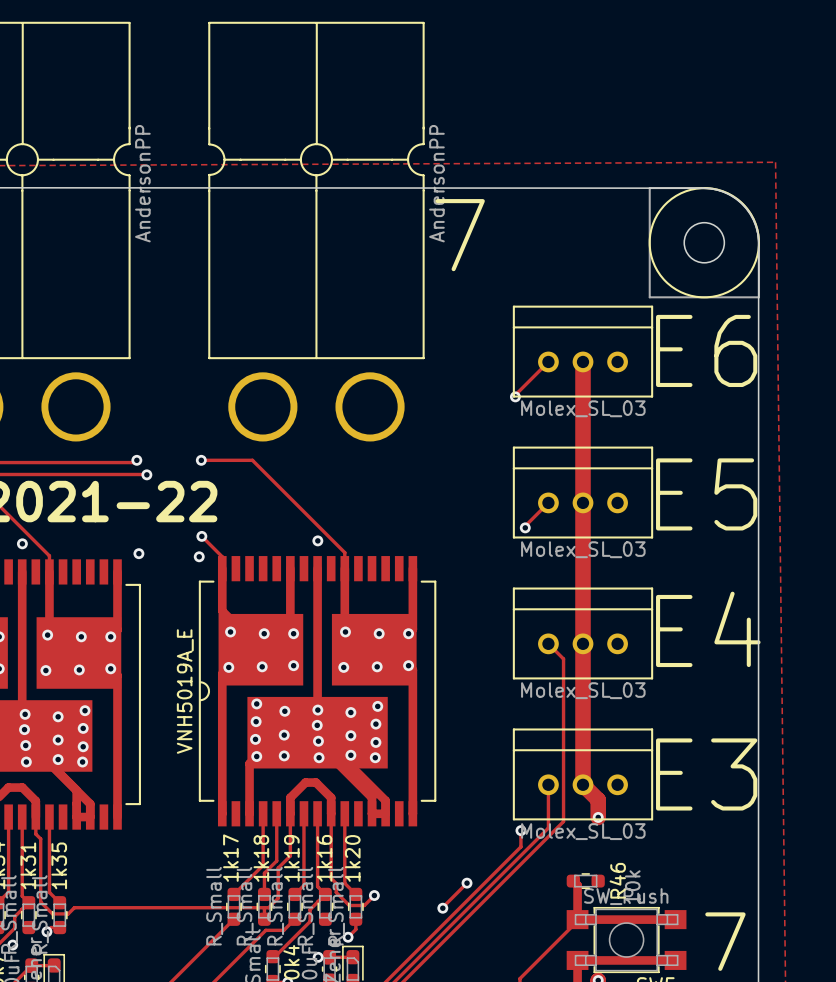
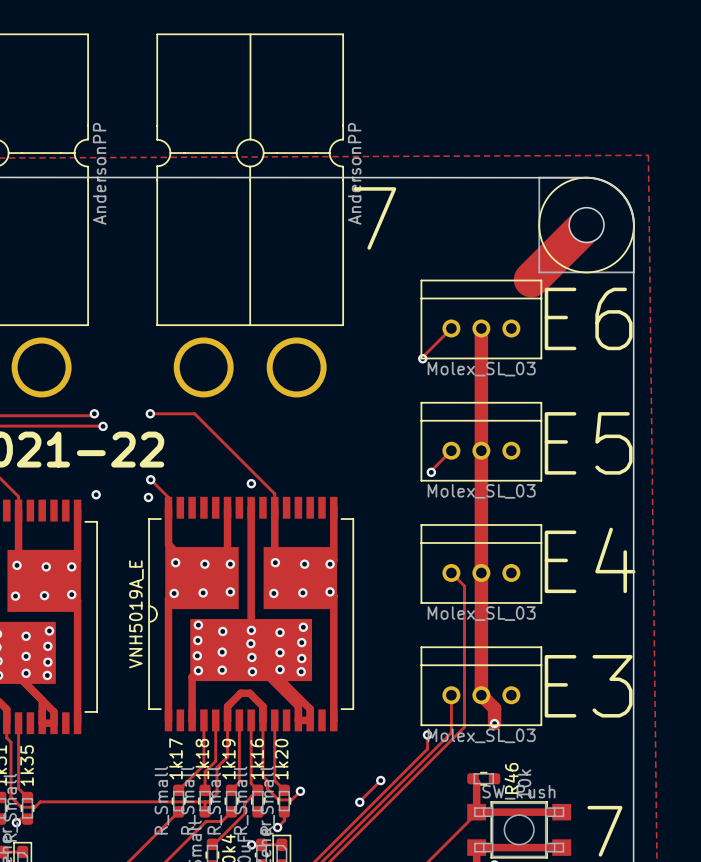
track: none -> (585, 225) (531, 279)

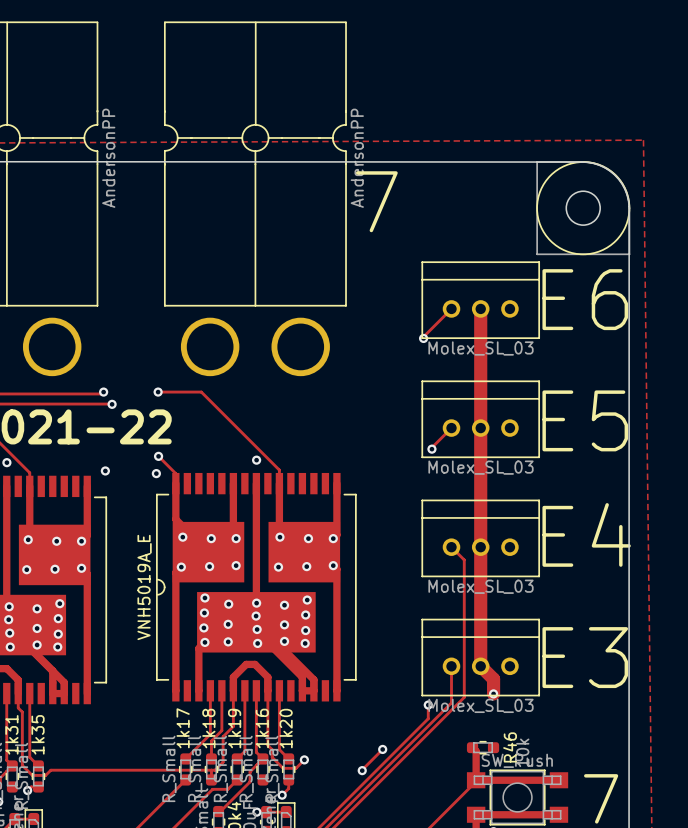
track: (585, 225) (531, 279) -> none

